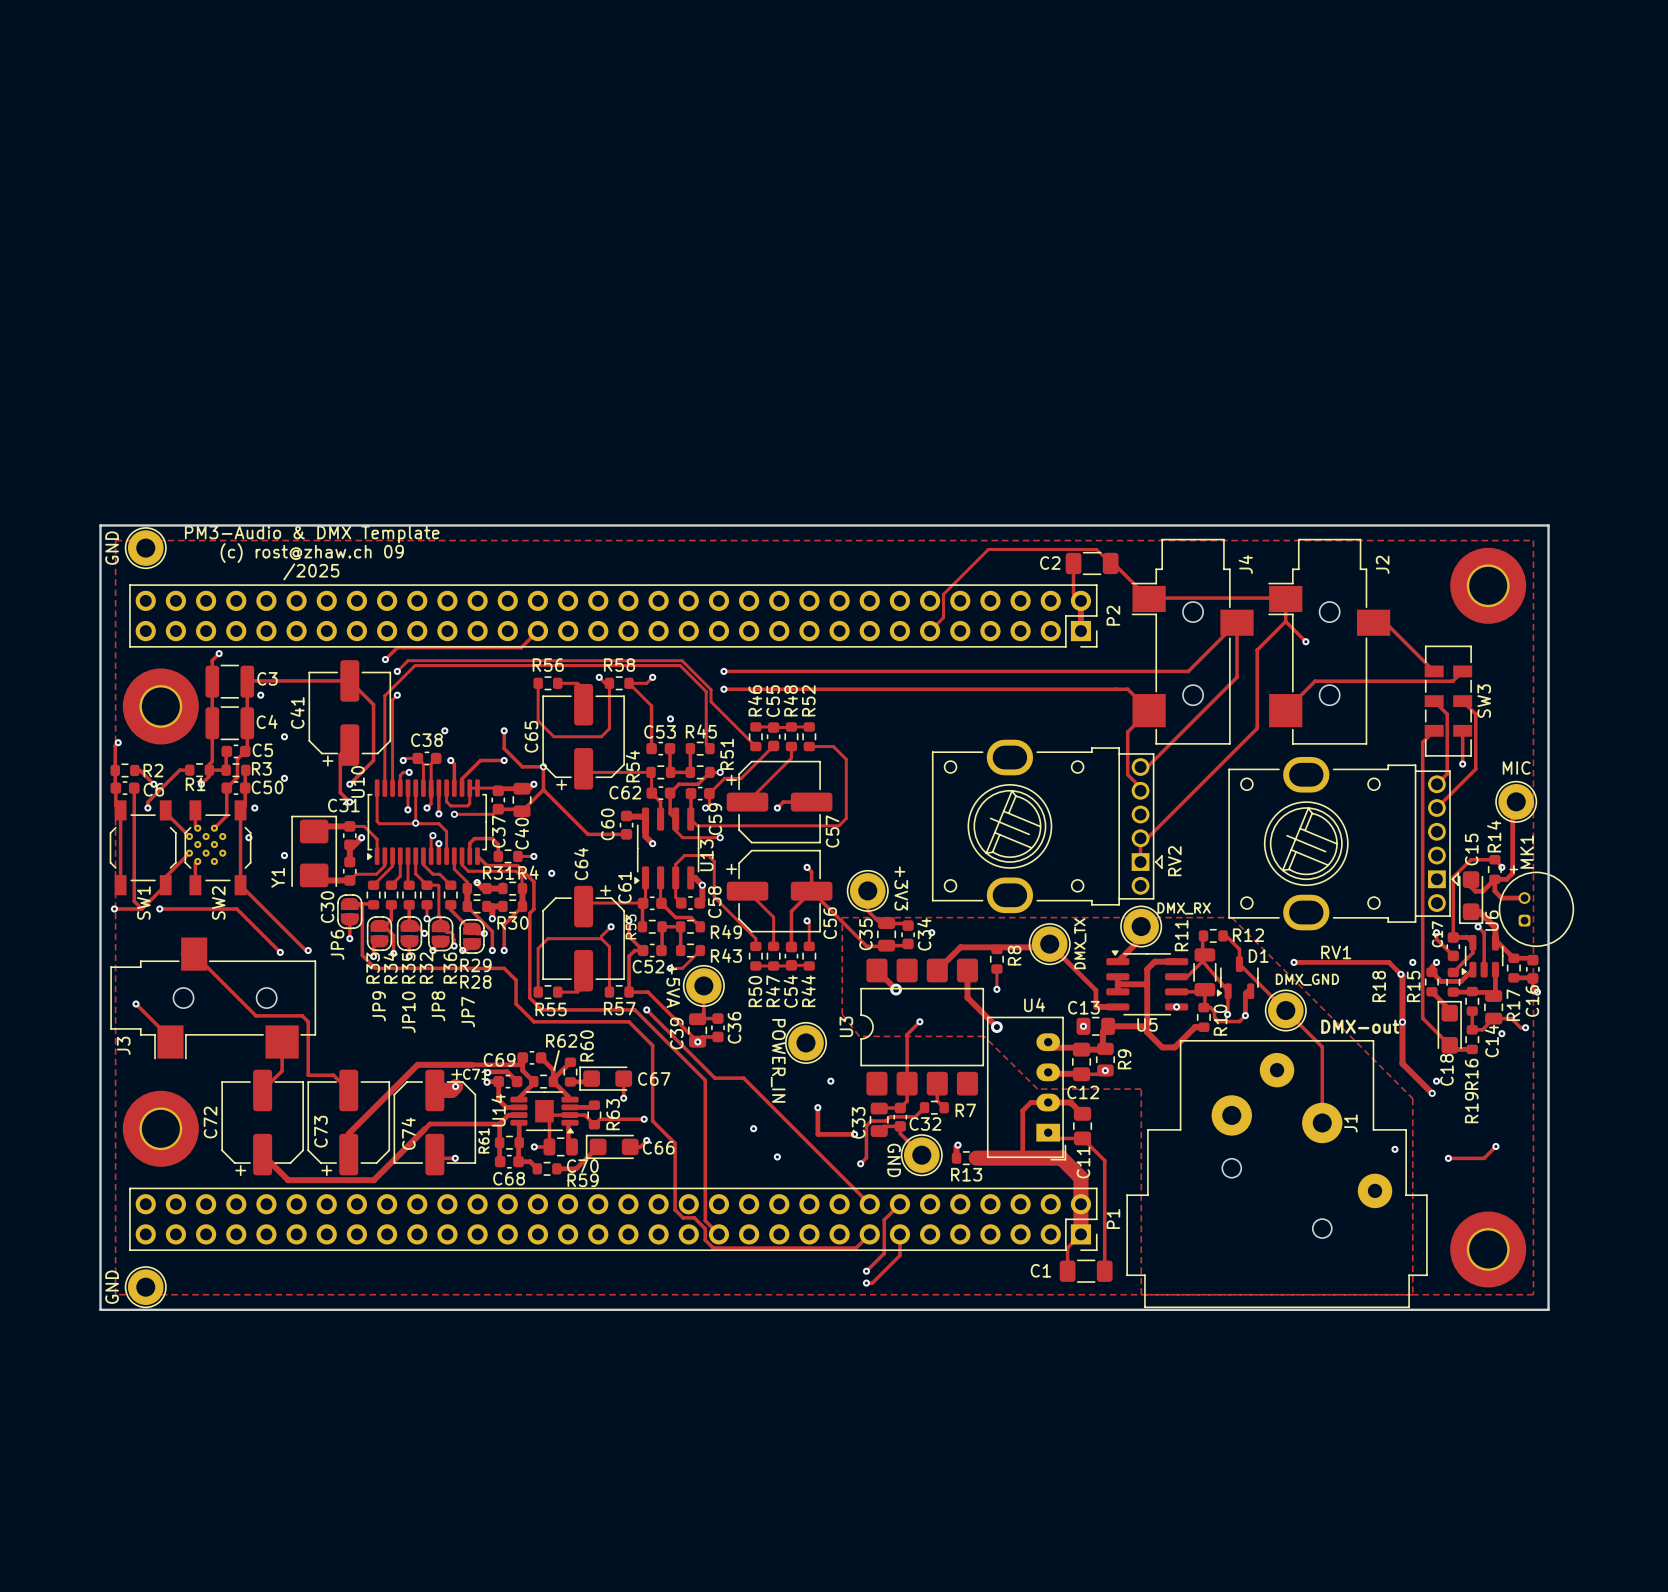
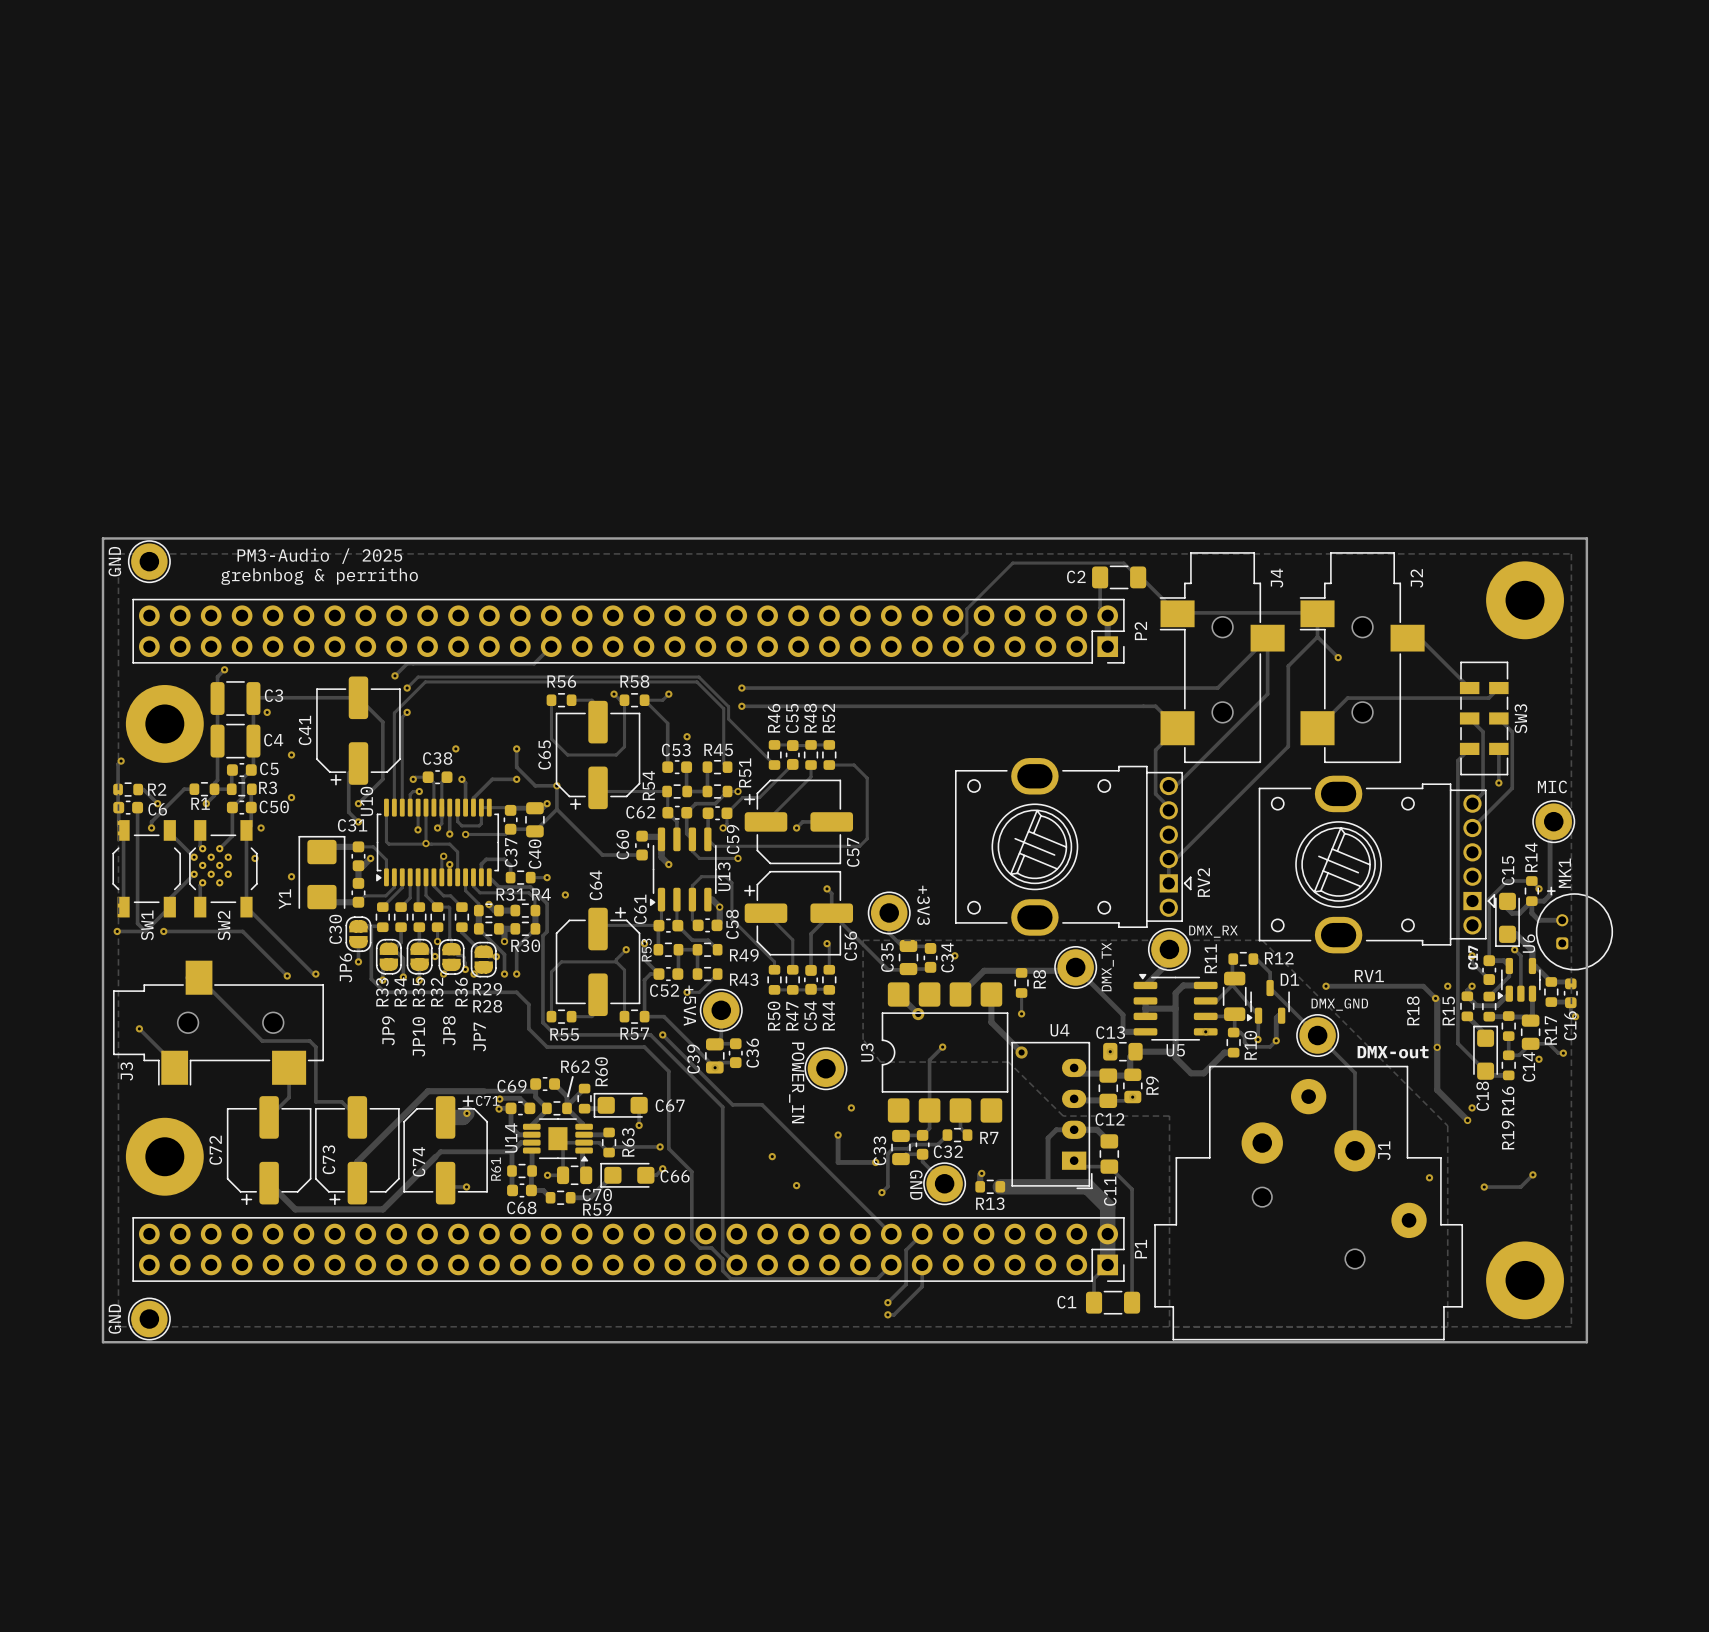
text: PM3-Audio & DMX Template (312, 534) -> none
text: none -> PM3-Audio / 2025 (319, 556)
text: (c) rost@zhaw.ch 09 (312, 553) -> none
text: none -> grebnbog & perritho (319, 576)
text: /2025 (311, 571) -> none

